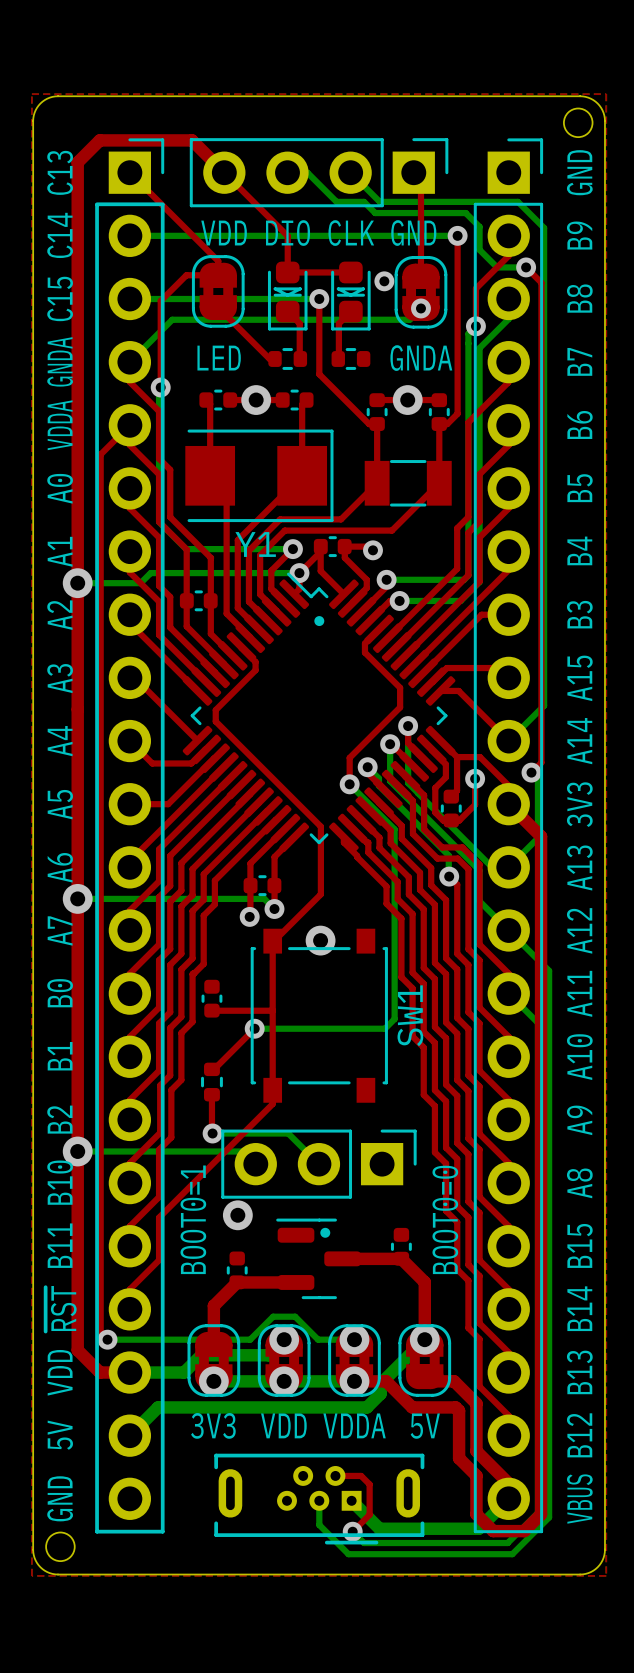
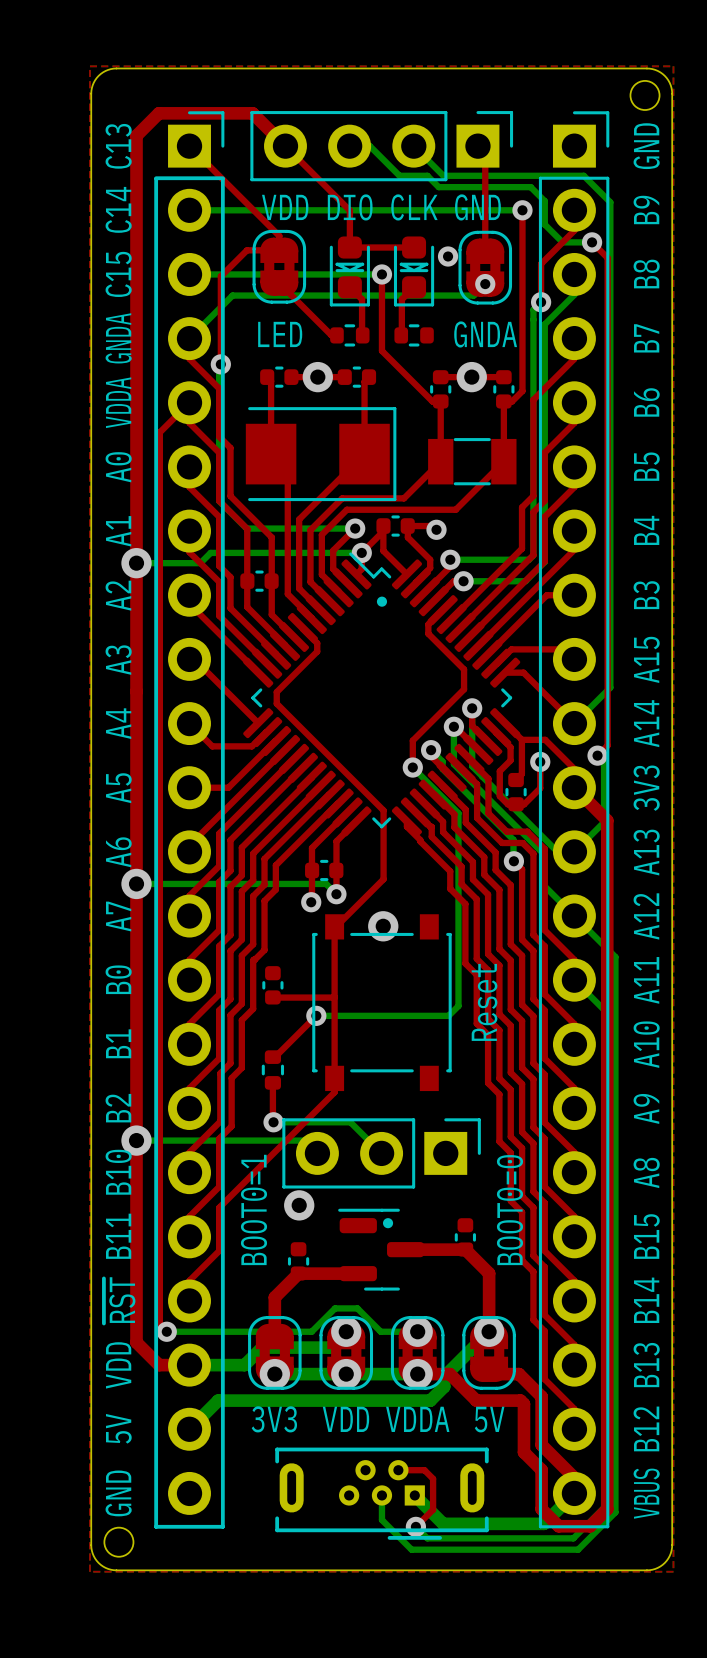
Y1 name: Y1 (255, 544) -> none
SW1 name: SW1 (410, 1015) -> none
SW1 value: none -> Reset (484, 1002)

